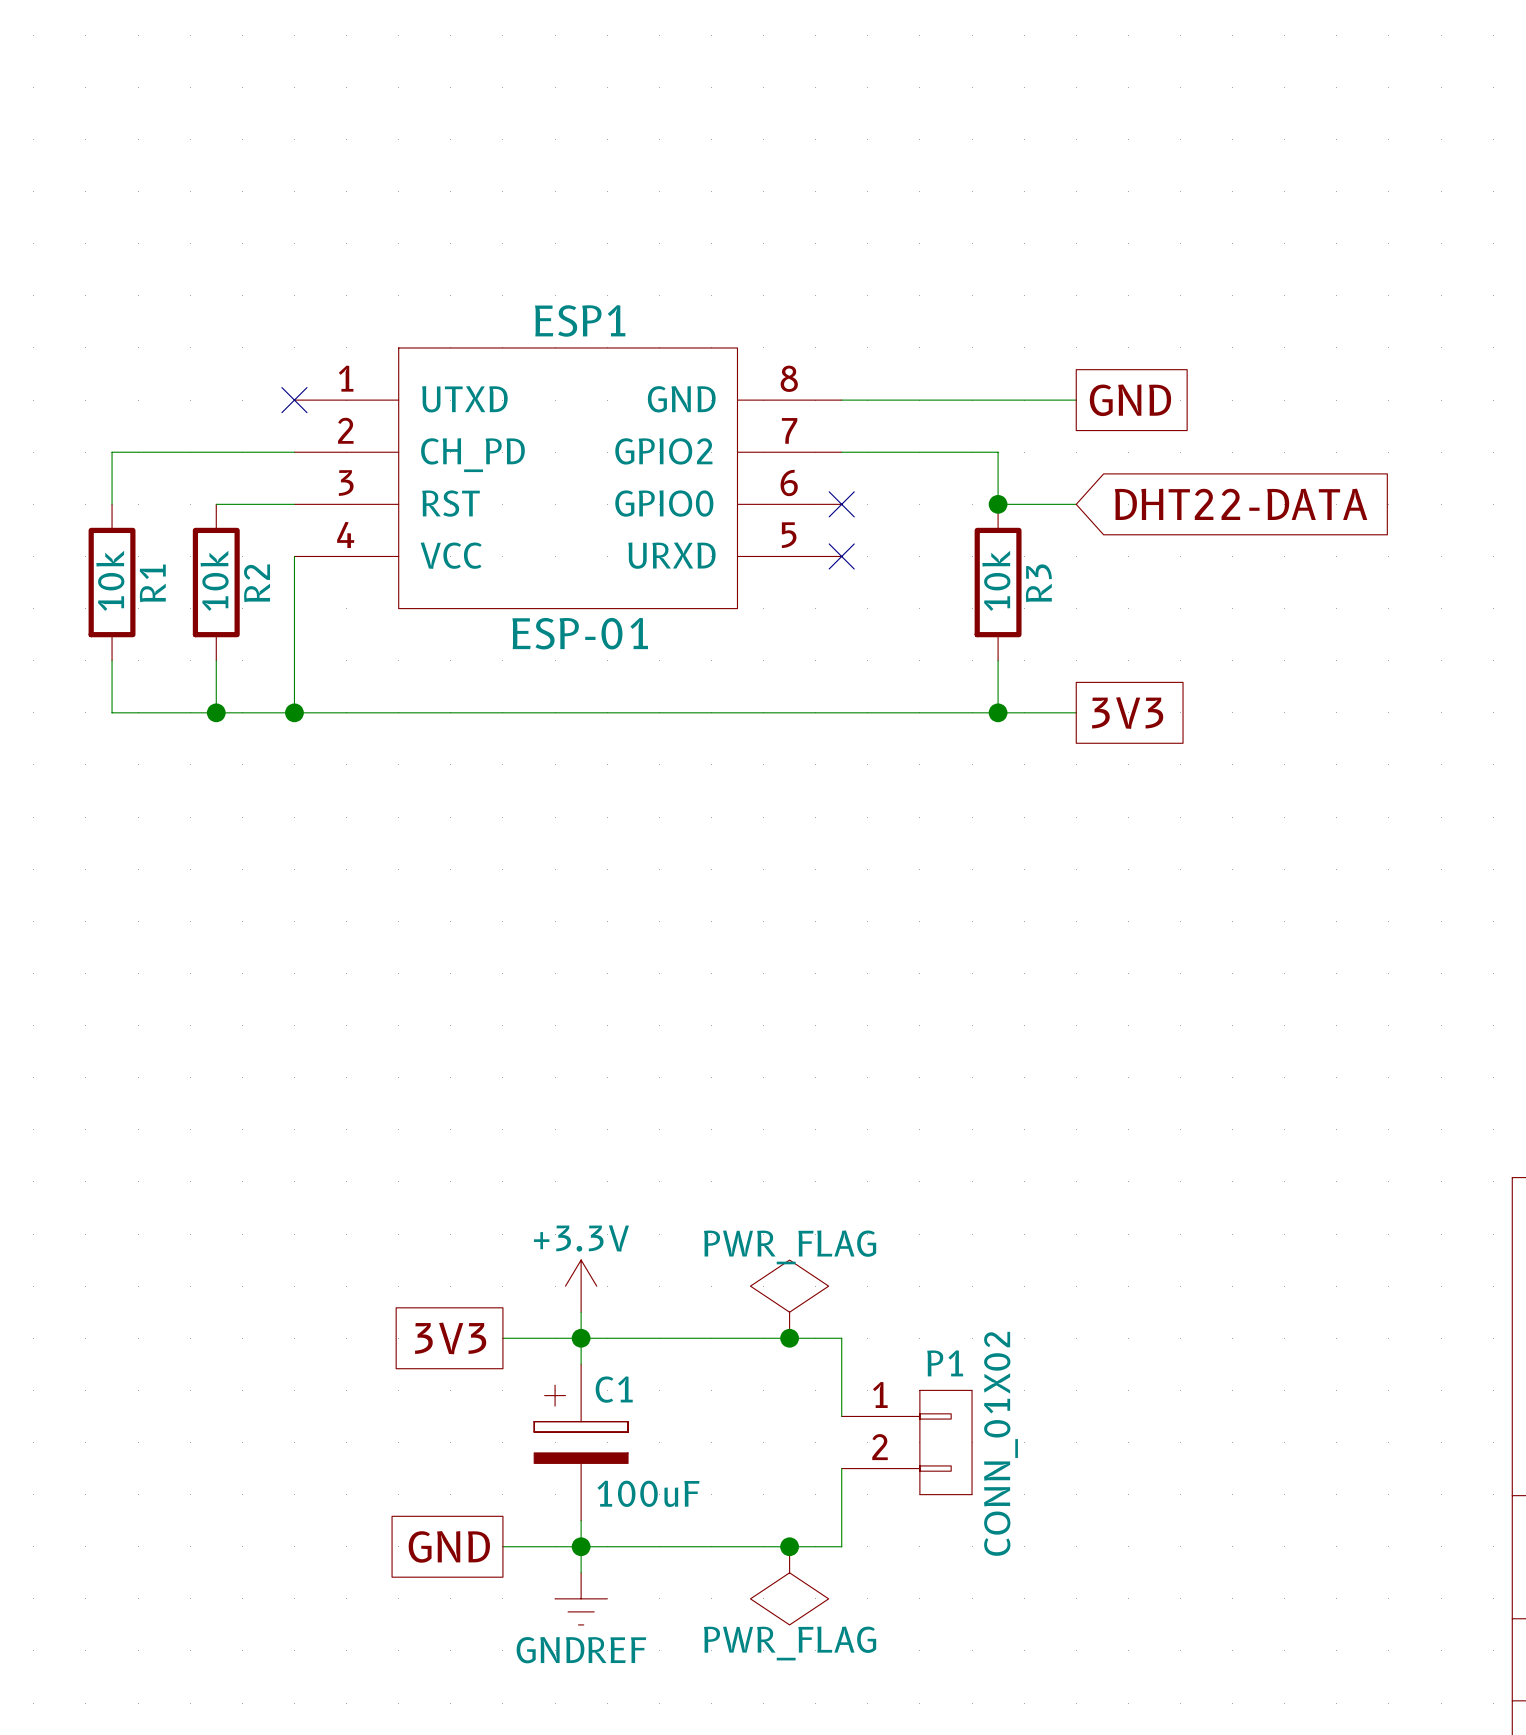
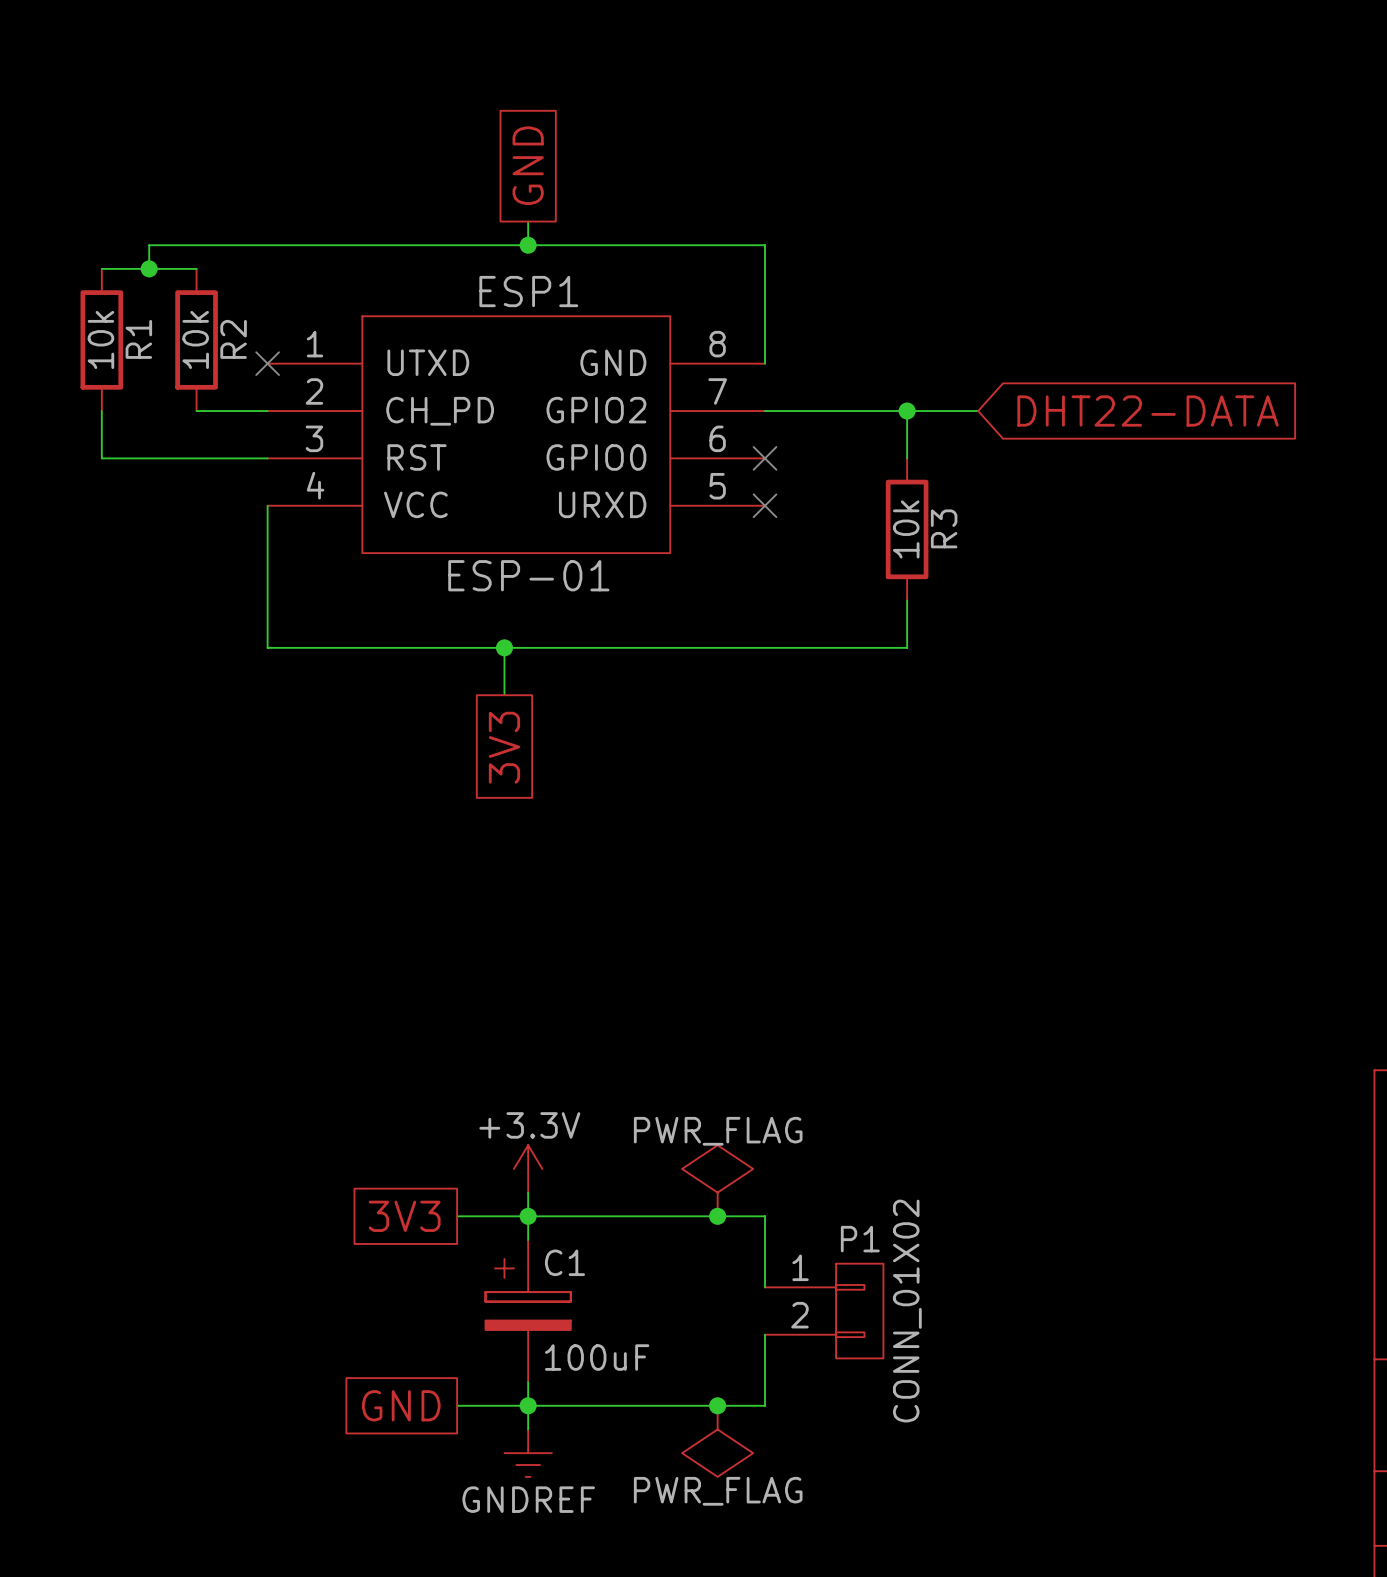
global label: none -> GND (528, 165)
wire: none -> (528, 221) (528, 245)
junction: none -> (528, 245)
wire: none -> (101, 268) (196, 268)
junction: none -> (149, 268)
wire: (841, 400) (1076, 400) -> (765, 363) (765, 245) (149, 245) (149, 268)
global label: GND (1130, 400) -> none
wire: (112, 452) (216, 452) -> (101, 458) (196, 458)
wire: (998, 504) (1076, 504) -> (907, 411) (978, 411)
junction position: (998, 504) -> (907, 411)
global label position: DHT22-DATA (1241, 504) -> DHT22-DATA (1148, 411)
R1 position: (112, 582) -> (101, 339)
R2 position: (216, 582) -> (196, 339)
wire: (112, 660) (112, 712) (294, 712) -> none
wire: (216, 660) (216, 712) -> (504, 647) (504, 695)
junction: (216, 712) -> none
junction: (294, 712) -> none
junction: none -> (504, 647)
wire: (998, 712) (1076, 712) -> none
junction: (998, 712) -> none
global label: 3V3 (1127, 713) -> none
global label: none -> 3V3 (504, 747)

